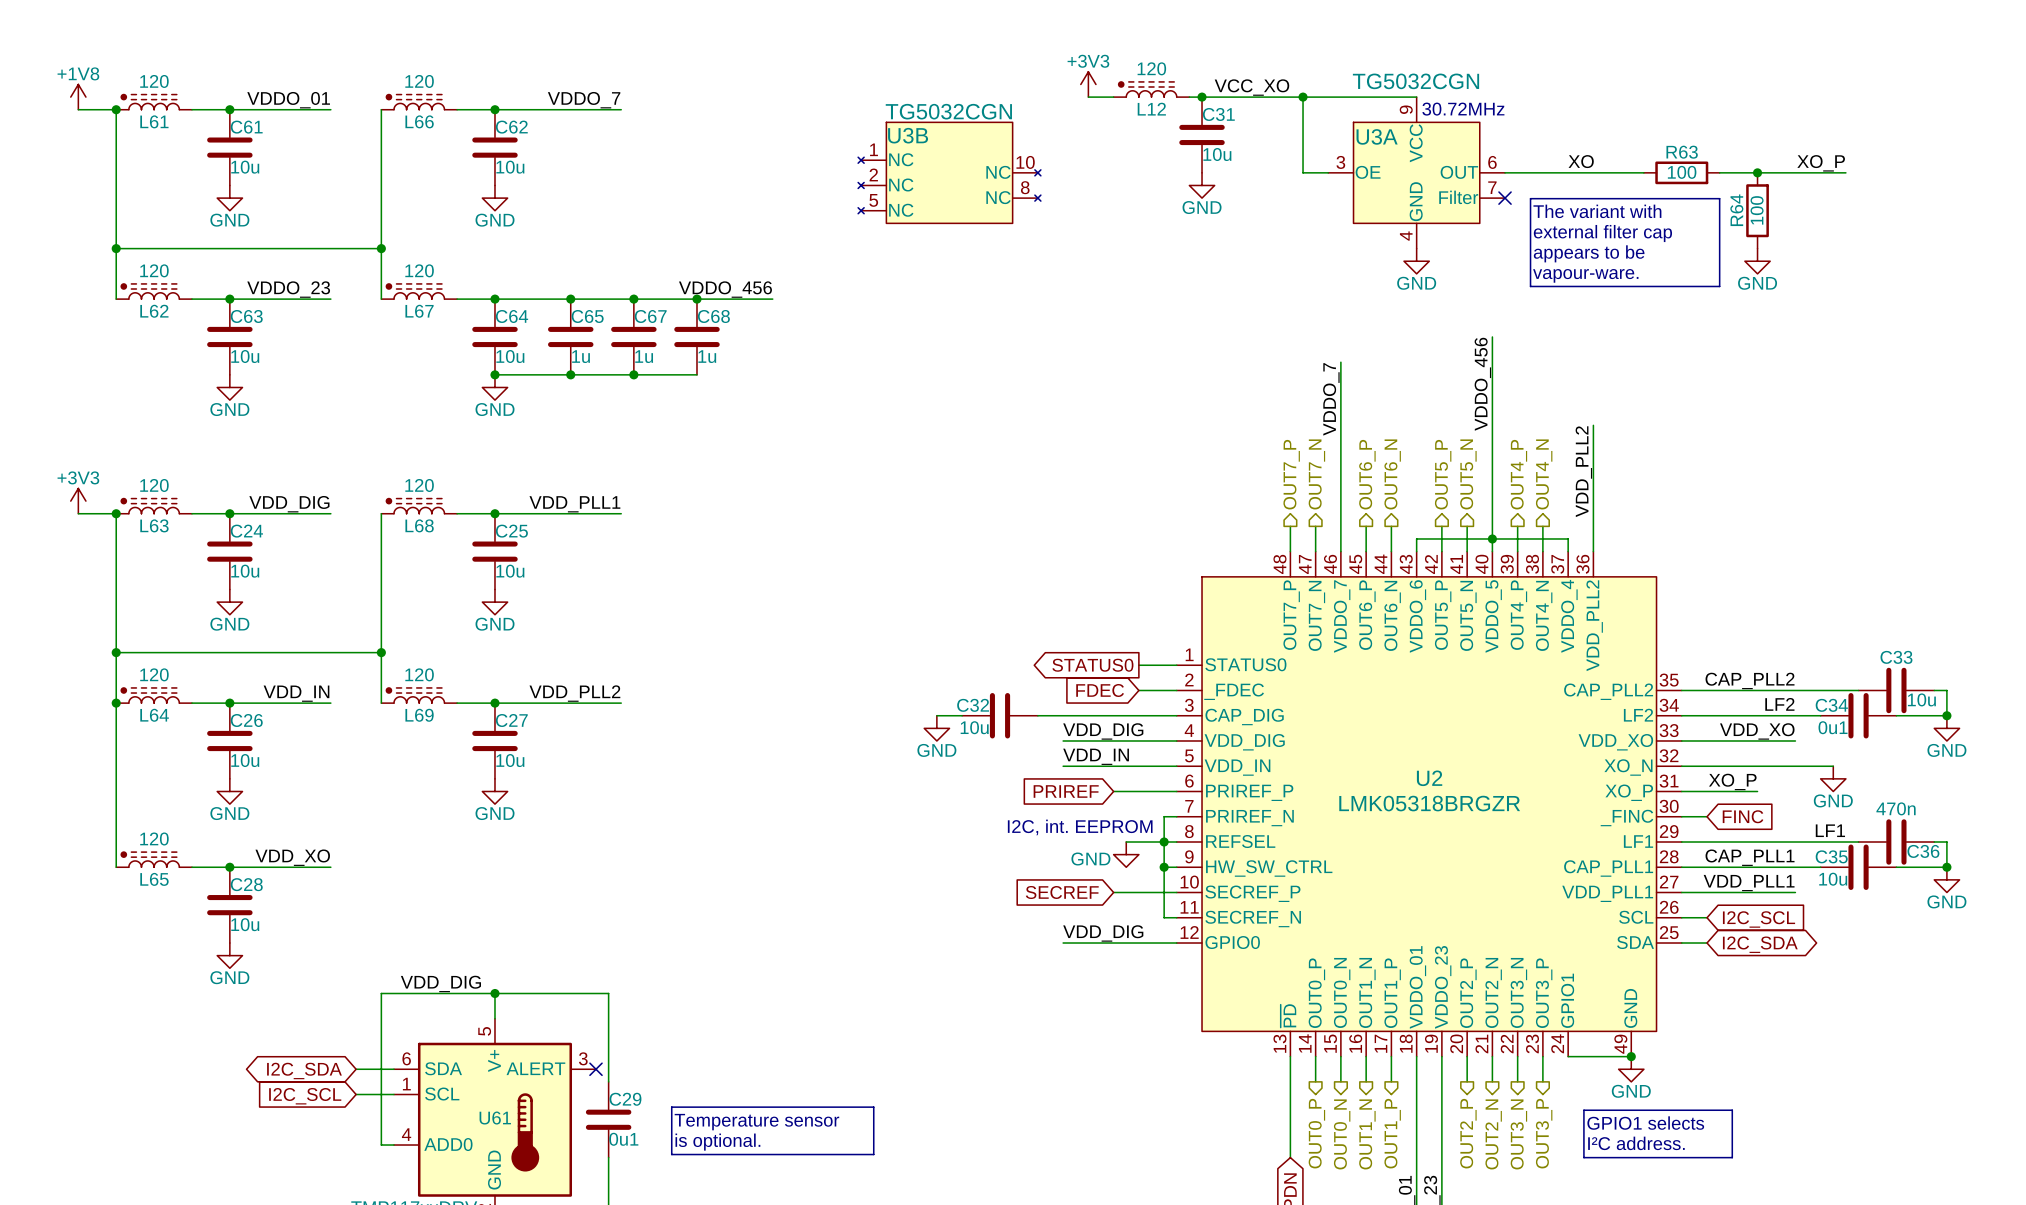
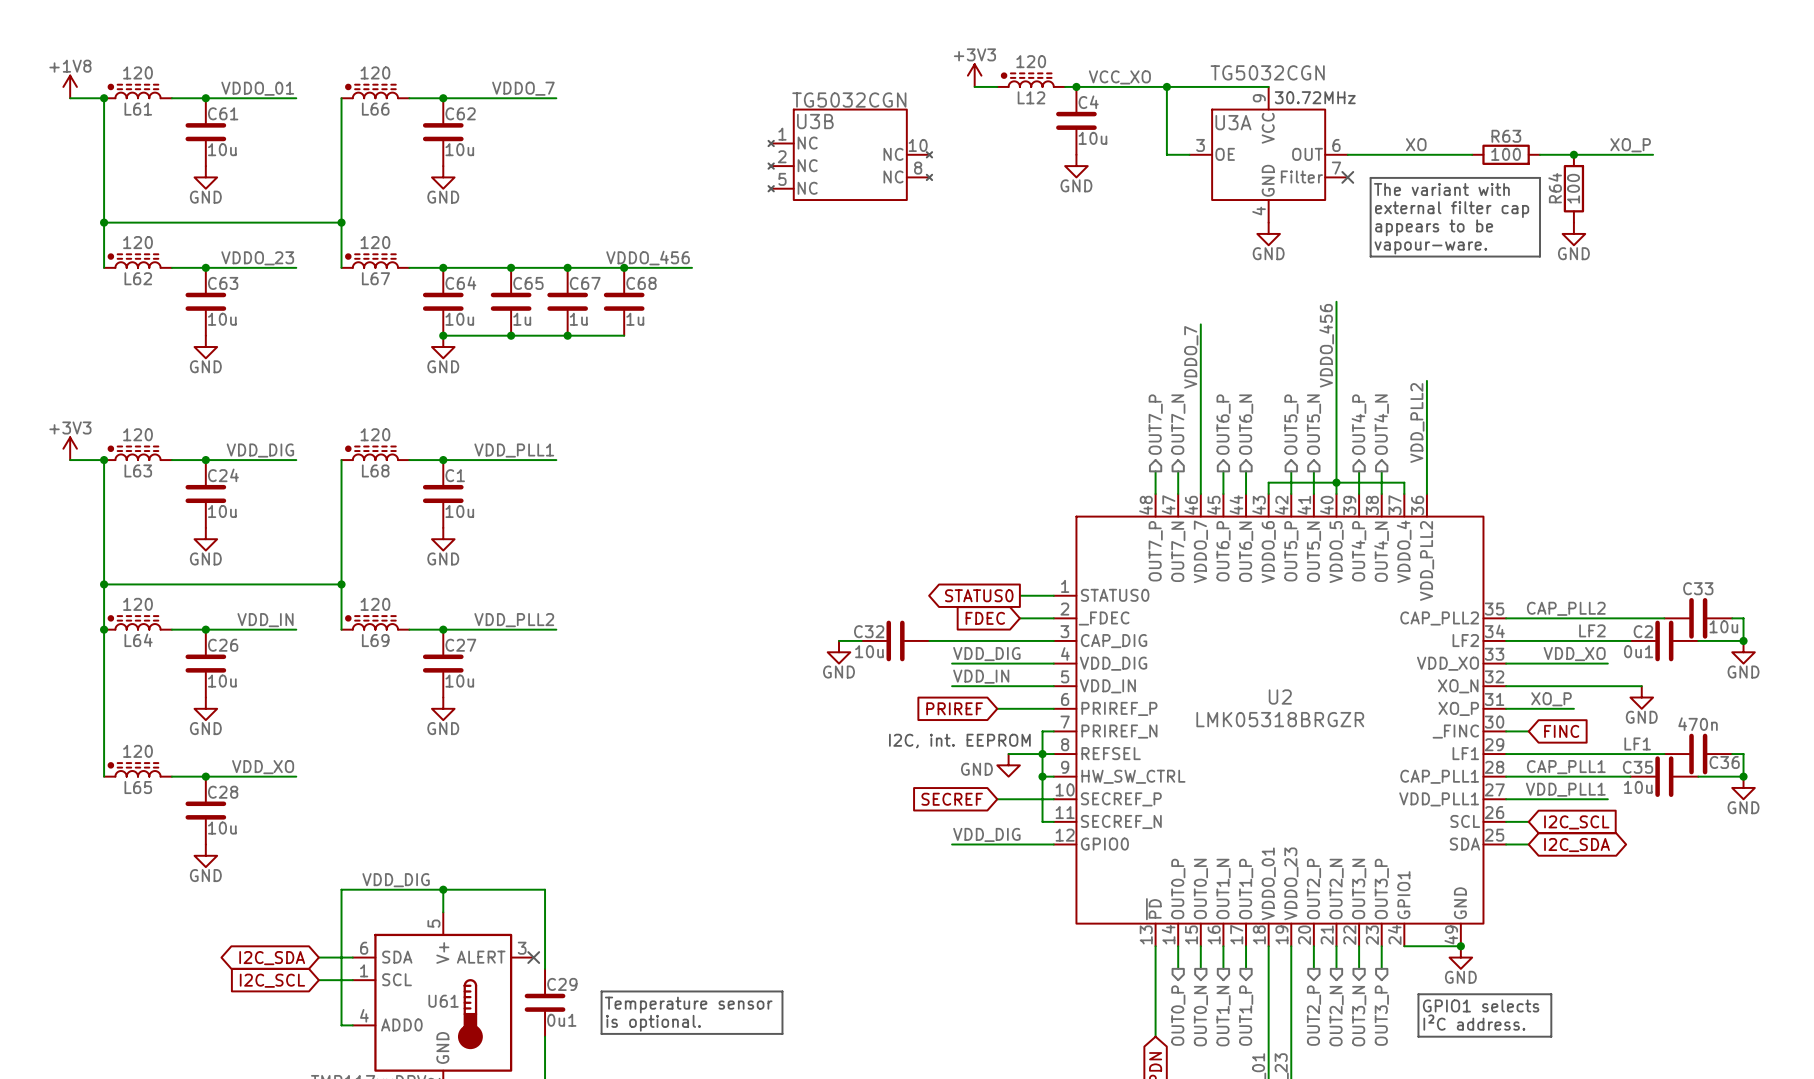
C31 name: C31 (1218, 114) -> C4 (1088, 102)
C25 name: C25 (511, 531) -> C1 (455, 475)
C34 name: C34 (1831, 705) -> C2 (1643, 631)

